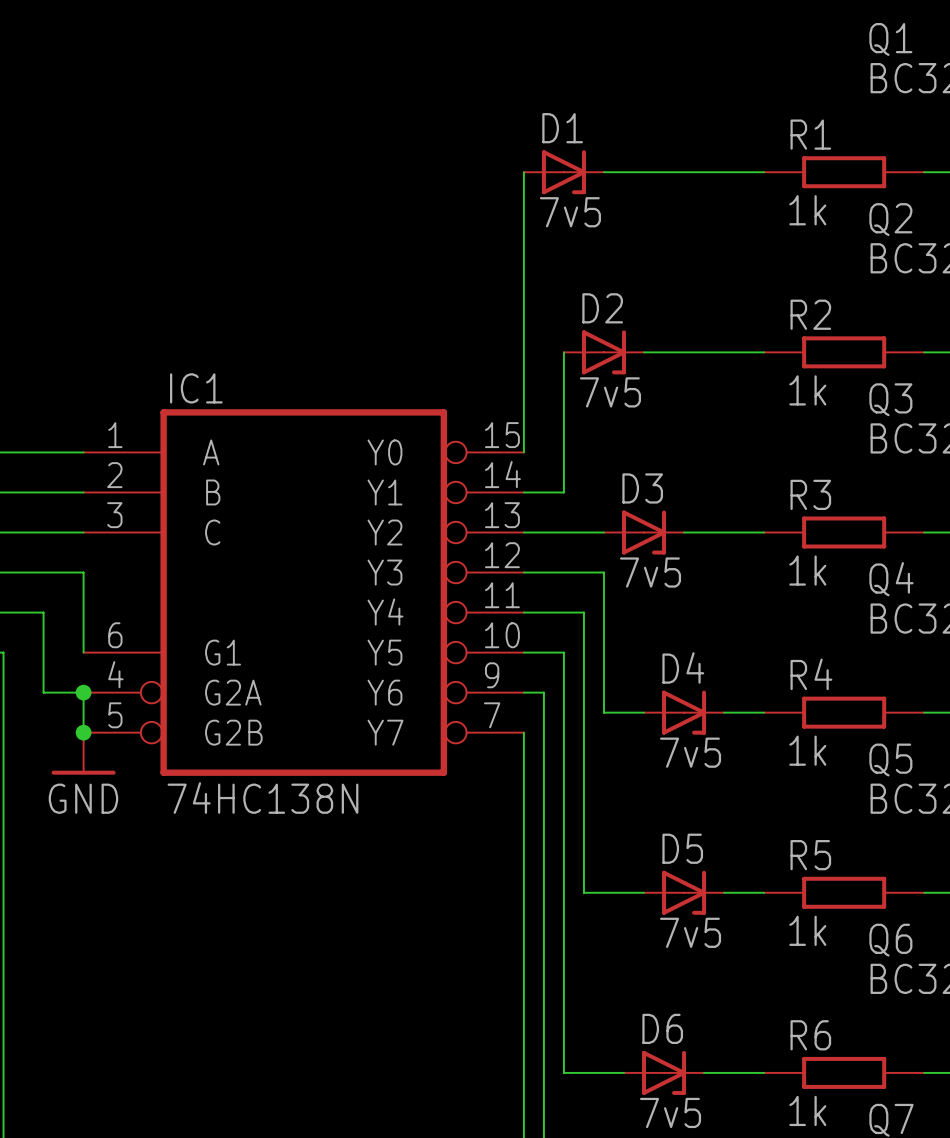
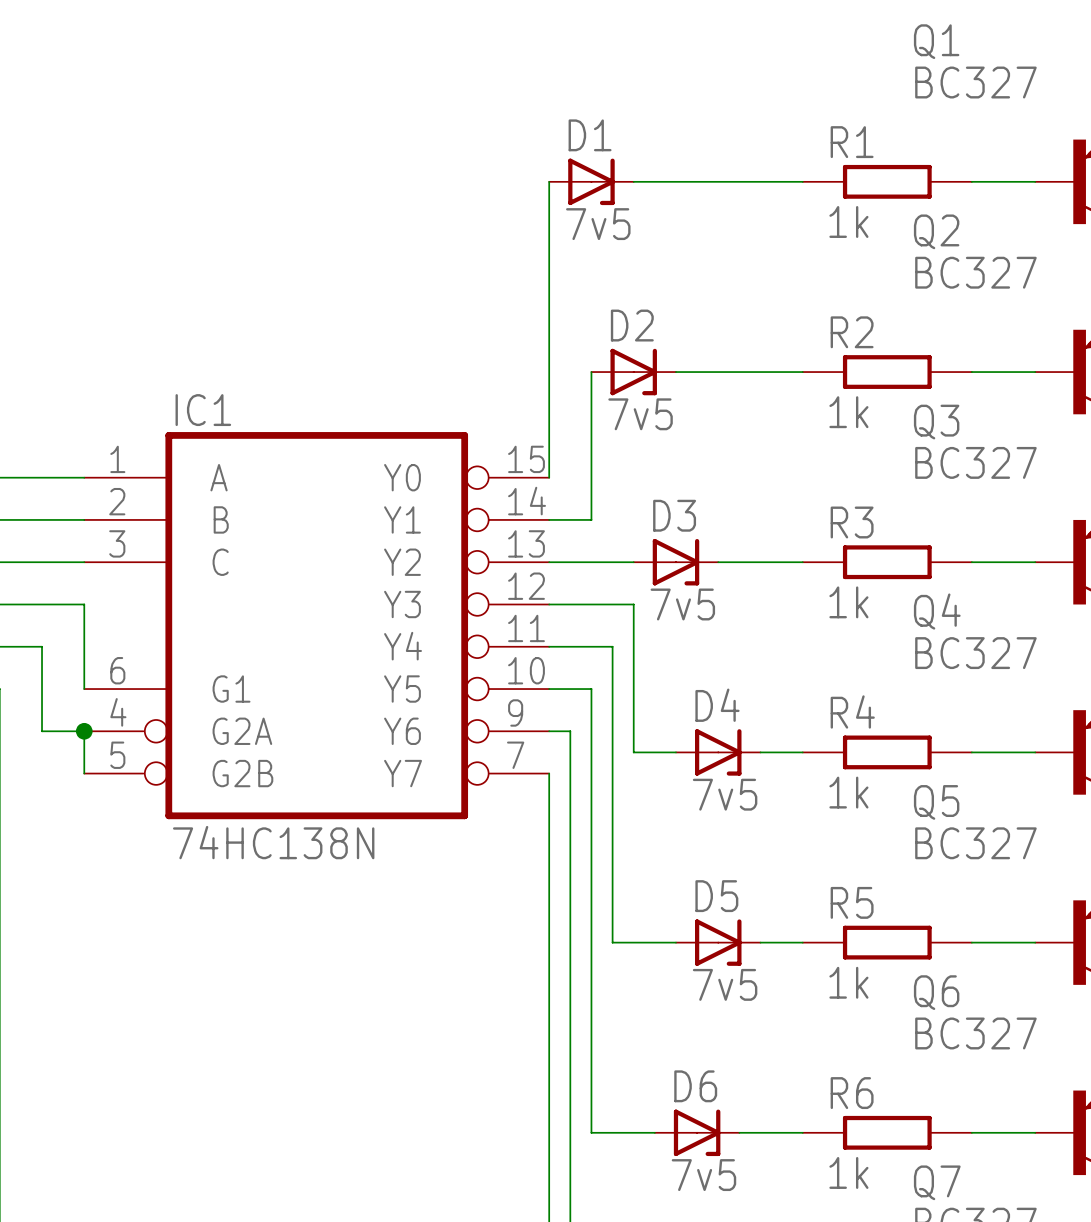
junction: (83, 732) -> none
power symbol: GND (83, 753) -> none

